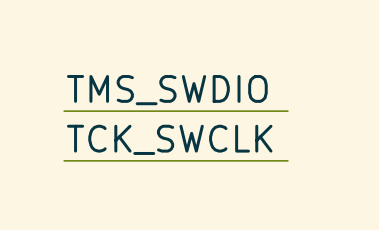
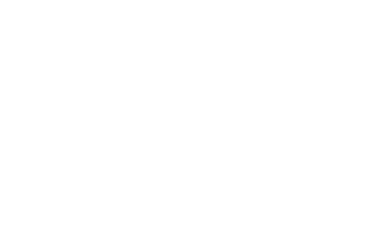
label: TMS_SWDIO (167, 90) -> none
wire: (64, 111) (287, 111) -> none
label: TCK_SWCLK (169, 139) -> none
wire: (64, 160) (287, 160) -> none

